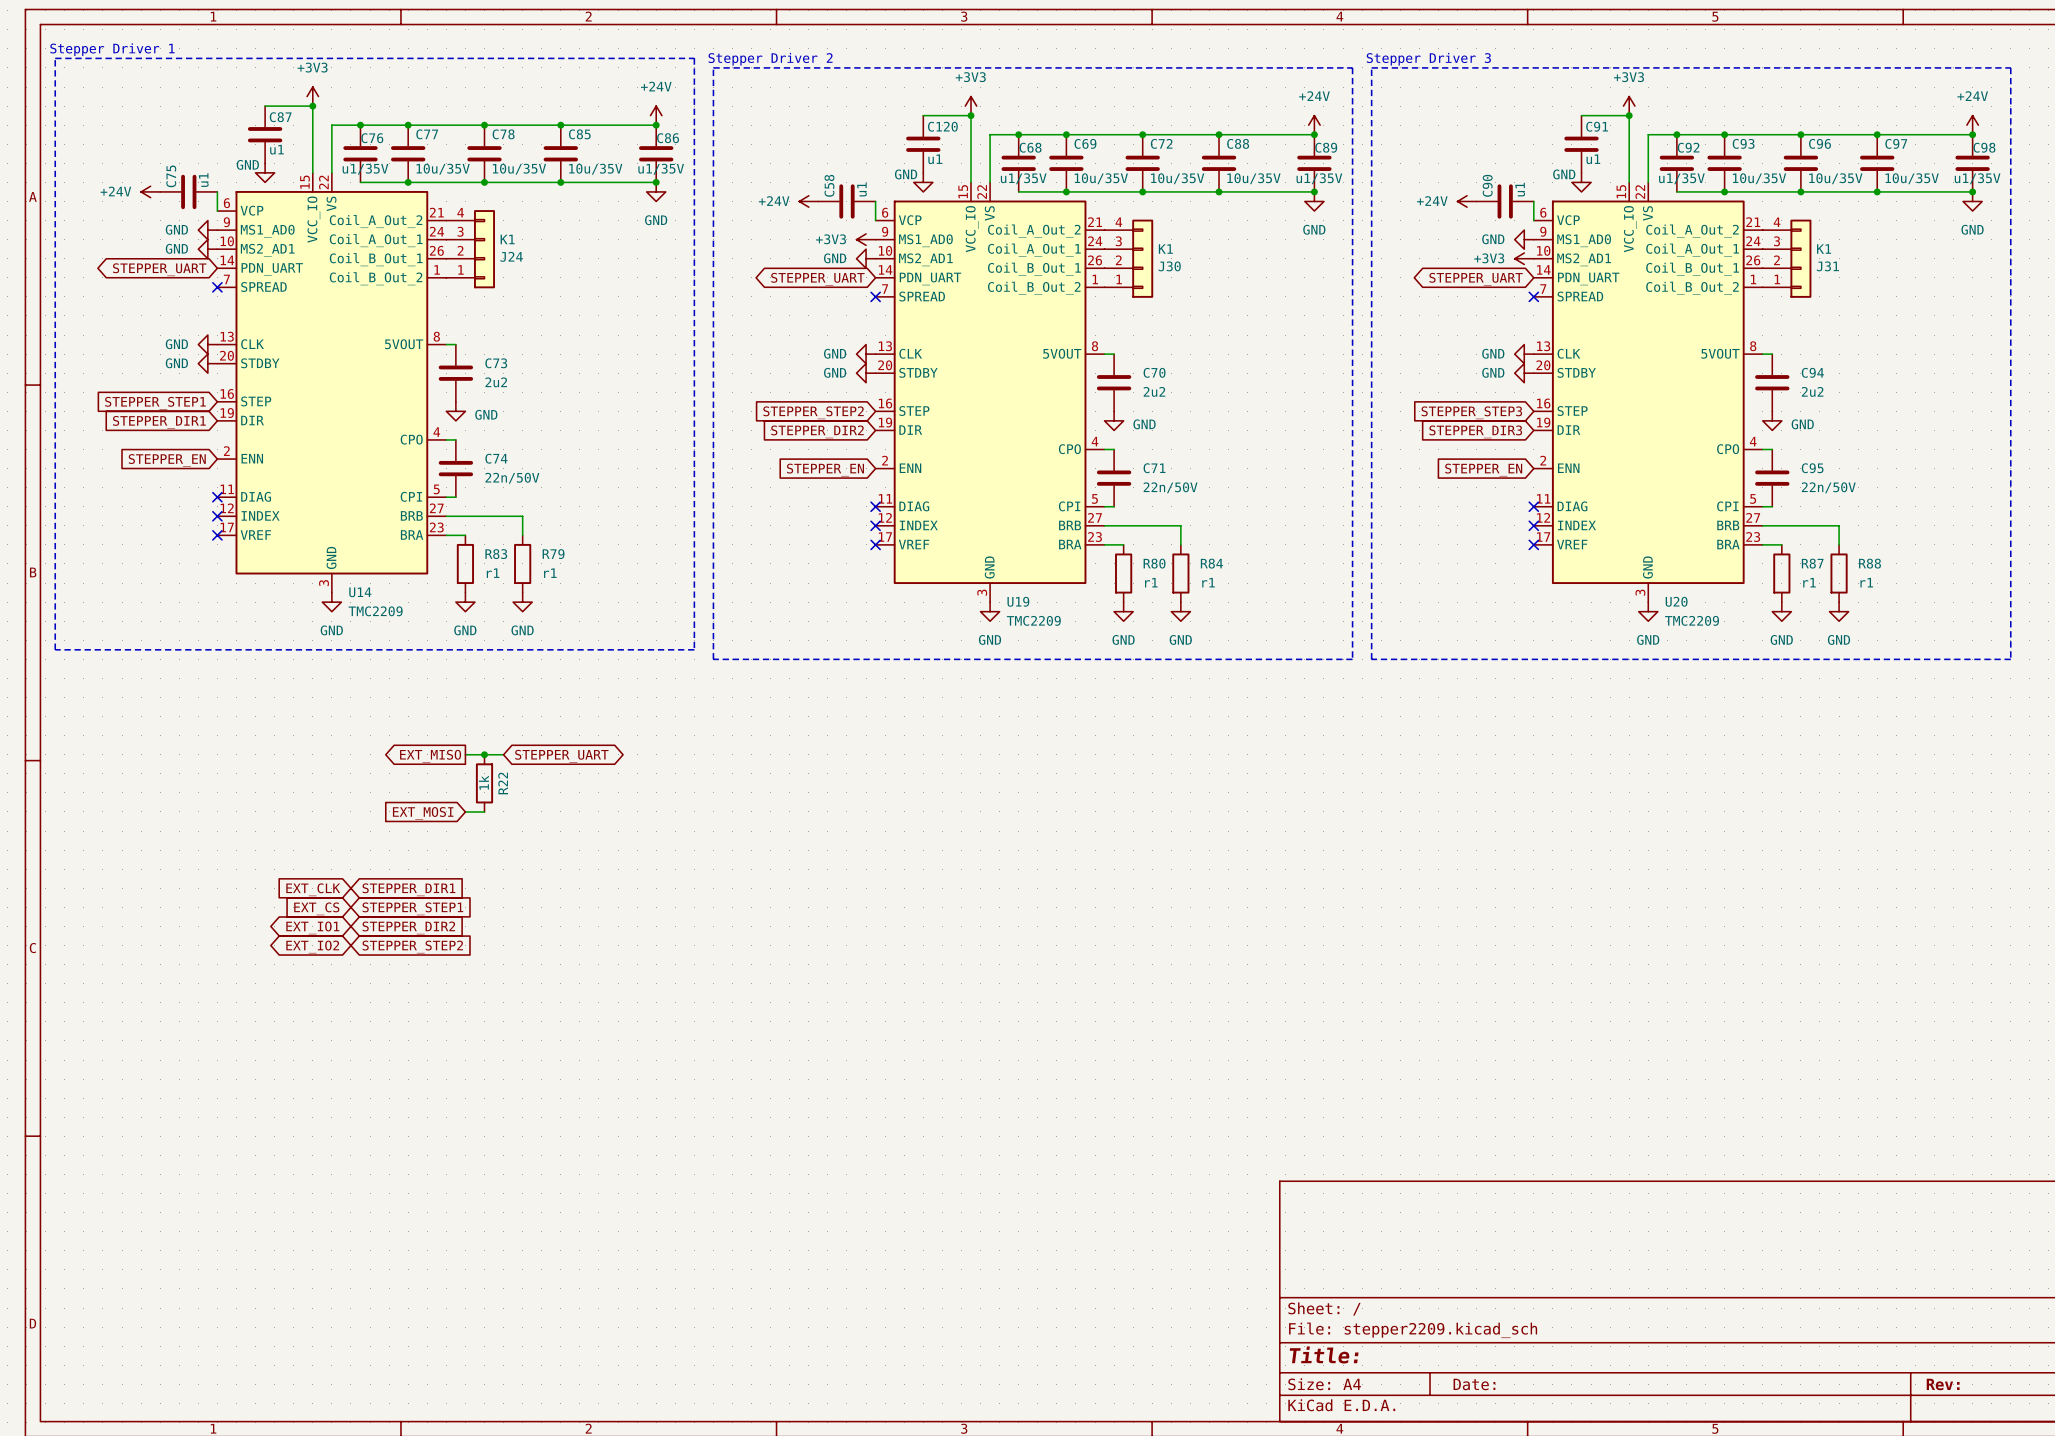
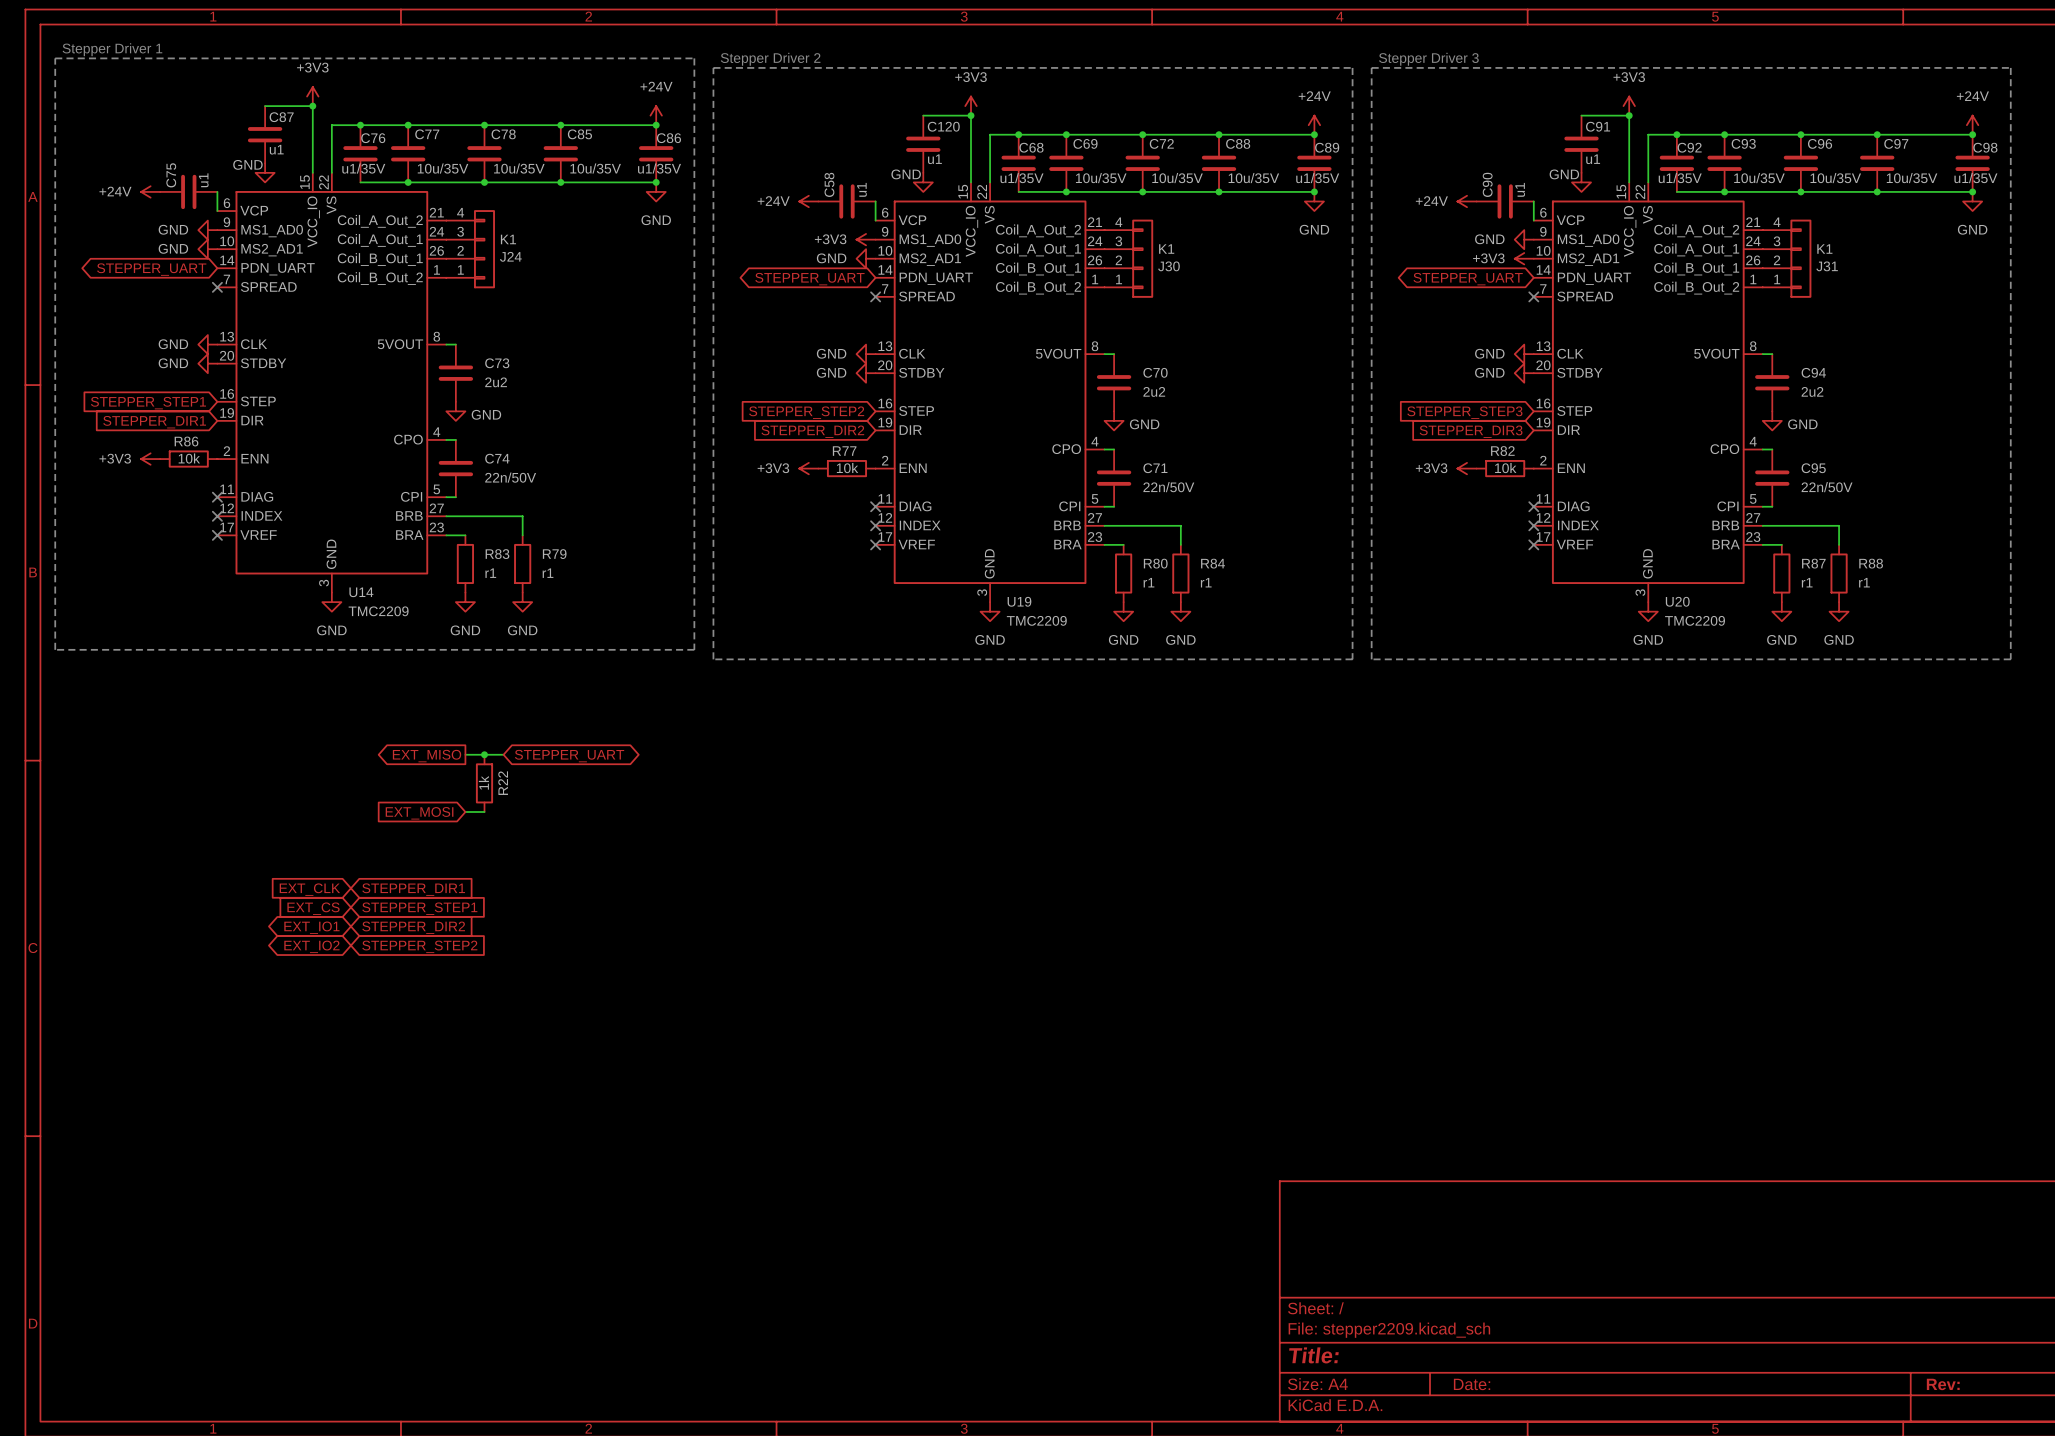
power symbol: none -> +3V3 (150, 459)
R86: none -> 10k (188, 459)
global label: STEPPER_EN (167, 460) -> none
power symbol: none -> +3V3 (808, 468)
R77: none -> 10k (846, 468)
power symbol: none -> +3V3 (1467, 468)
R82: none -> 10k (1505, 468)
global label: STEPPER_EN (825, 470) -> none
global label: STEPPER_EN (1483, 470) -> none

